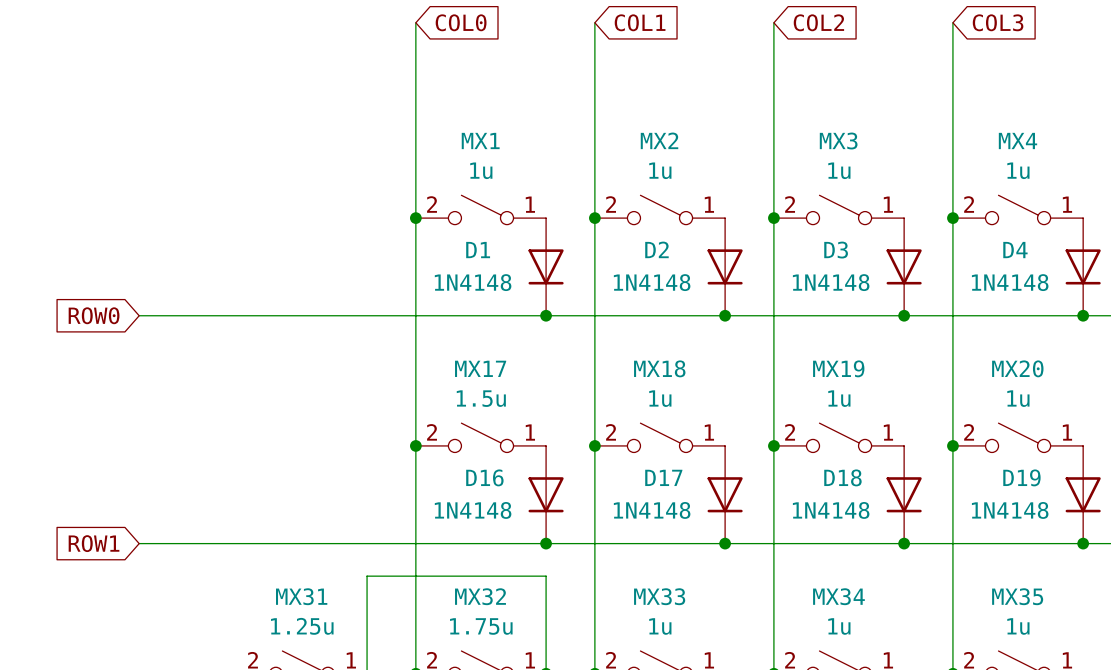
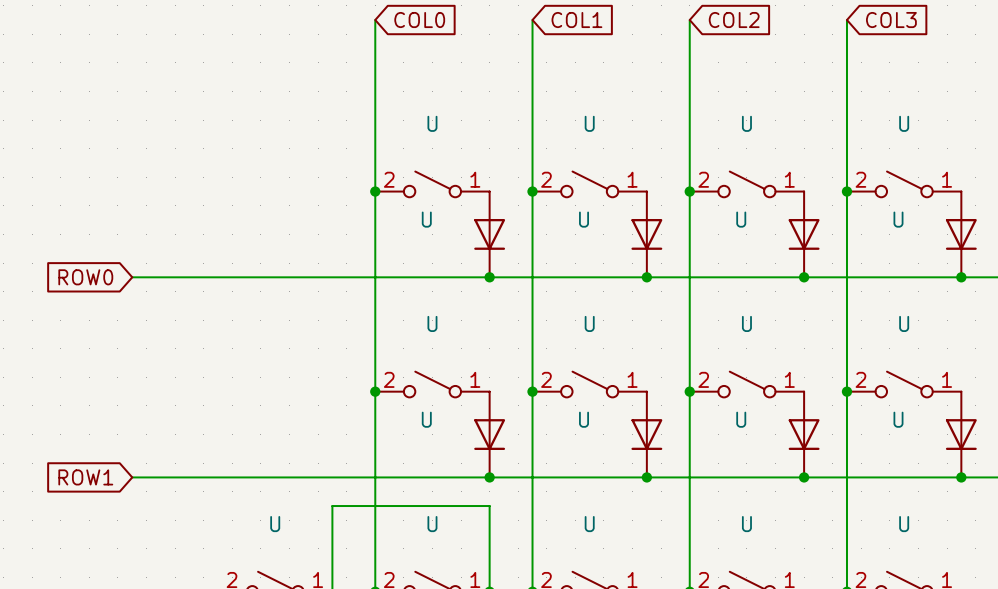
MX1 name: MX1 (480, 140) -> U (432, 123)
MX2 name: MX2 (659, 140) -> U (589, 123)
MX4 name: MX4 (1017, 140) -> U (904, 123)
MX3 name: MX3 (838, 141) -> U (746, 123)
MX1 value: 1u (481, 170) -> none
MX2 value: 1u (660, 170) -> none
MX3 value: 1u (839, 170) -> none
MX4 value: 1u (1018, 170) -> none
D2 name: D2 (656, 249) -> U (584, 219)
D1 name: D1 (478, 250) -> U (426, 219)
D3 name: D3 (836, 250) -> U (741, 219)
D4 name: D4 (1015, 250) -> U (898, 219)
D1 value: 1N4148 (473, 282) -> none
D2 value: 1N4148 (652, 282) -> none
D3 value: 1N4148 (831, 282) -> none
D4 value: 1N4148 (1010, 282) -> none
MX17 name: MX17 (480, 368) -> U (432, 323)
MX18 name: MX18 (659, 368) -> U (589, 323)
MX19 name: MX19 (838, 368) -> U (746, 323)
MX20 name: MX20 (1017, 368) -> U (904, 323)
MX17 value: 1.5u (481, 398) -> none
MX18 value: 1u (660, 398) -> none
MX19 value: 1u (839, 398) -> none
MX20 value: 1u (1018, 398) -> none
D16 name: D16 (484, 477) -> U (426, 419)
D17 name: D17 (663, 477) -> U (584, 419)
D18 name: D18 (842, 477) -> U (741, 419)
D19 name: D19 (1021, 477) -> U (898, 419)
D16 value: 1N4148 (473, 510) -> none
D17 value: 1N4148 (652, 510) -> none
D18 value: 1N4148 (831, 510) -> none
D19 value: 1N4148 (1010, 510) -> none
MX31 name: MX31 (301, 596) -> U (275, 524)
MX32 name: MX32 (480, 596) -> U (432, 524)
MX33 name: MX33 (659, 596) -> U (589, 524)
MX34 name: MX34 (838, 596) -> U (746, 524)
MX35 name: MX35 (1017, 596) -> U (904, 524)
MX31 value: 1.25u (302, 626) -> none
MX32 value: 1.75u (481, 626) -> none
MX33 value: 1u (660, 626) -> none
MX34 value: 1u (839, 626) -> none
MX35 value: 1u (1018, 626) -> none

